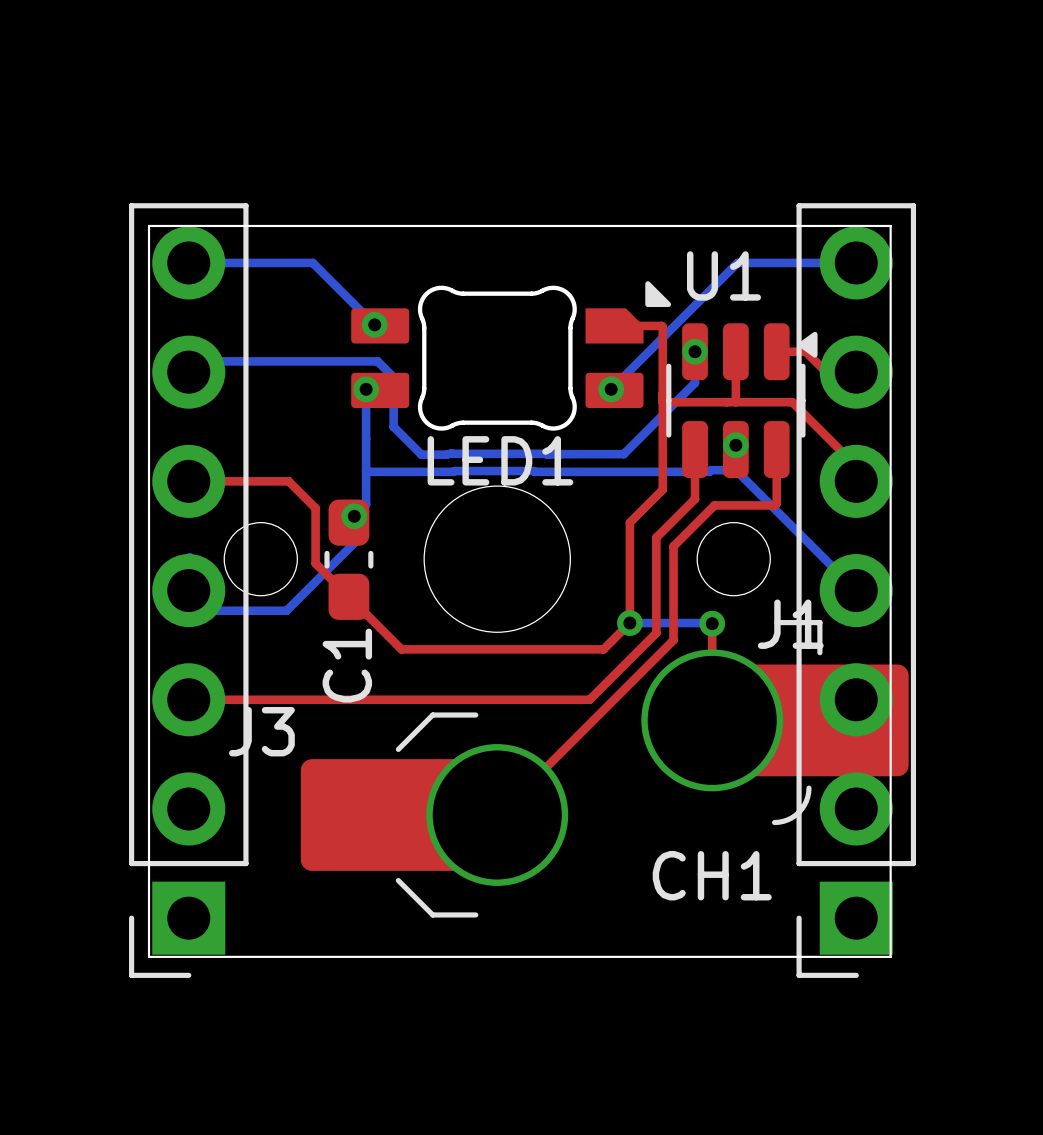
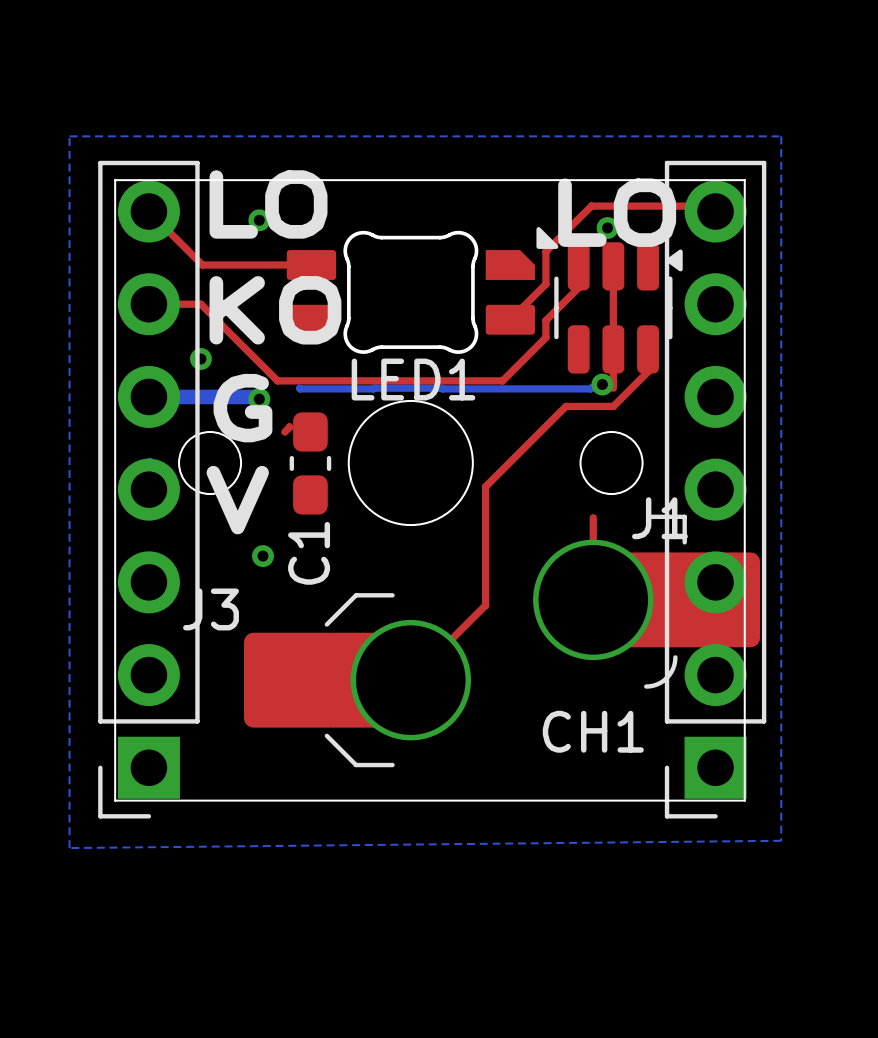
bottom zone outline: none -> (69, 136) (781, 136) (781, 840) (69, 848) (69, 136)
text: none -> LO (268, 204)
top track: none -> (148, 211) (202, 265) (311, 265)
bottom track: (188, 262) (312, 262) (374, 324) -> none
top track: none -> (715, 211) (710, 206) (591, 206) (545, 251) (545, 284) (510, 319)
bottom track: (856, 262) (737, 262) (611, 389) -> none
text: none -> LO (617, 212)
via: none -> (259, 220)
U1 name: U1 (724, 275) -> none
via: none -> (607, 228)
top track: none -> (578, 254) (578, 287) (545, 320) (545, 337) (502, 380) (277, 380) (200, 304) (148, 304)
via: (374, 324) -> none
top track: (614, 325) (662, 327) (662, 489) (629, 522) (629, 623) (603, 649) (401, 649) (315, 563) (315, 508) (288, 481) (188, 481) -> none
bottom track: (695, 351) (695, 382) (623, 454) (546, 454) -> none
via: (695, 351) -> none
top track: (776, 351) (805, 351) (826, 372) -> none
bottom track: (188, 372) (199, 361) (377, 361) (393, 377) (393, 426) (421, 454) (451, 453) -> none
text: none -> KO (275, 310)
bottom track: (366, 389) (366, 504) (354, 516) (354, 543) (286, 610) (208, 610) (188, 590) -> none
via: (366, 389) -> none
via: (611, 389) -> none
U1 position: (741, 400) -> (618, 307)
top track: (662, 402) (792, 402) (856, 466) (856, 481) -> none
via: none -> (200, 358)
bottom track: (735, 445) (735, 470) (856, 590) -> none
via position: (735, 445) -> (602, 384)
top track: (695, 449) (695, 498) (656, 537) (656, 633) (589, 699) (213, 699) -> none
top track: (776, 451) (776, 503) (774, 505) (714, 505) (673, 546) (673, 640) (498, 814) -> (648, 371) (613, 406) (565, 406) (485, 486) (485, 605) (410, 680)
bottom track: (452, 453) (545, 453) -> none
bottom track: none -> (148, 396) (257, 396) (259, 399)
text: none -> G (242, 408)
via position: (354, 516) -> (259, 399)
C1 position: (348, 559) -> (310, 463)
text: none -> V (237, 500)
bottom track: (629, 623) (712, 623) -> none
via: (629, 623) -> none
via: (712, 623) -> none
via: none -> (262, 556)

